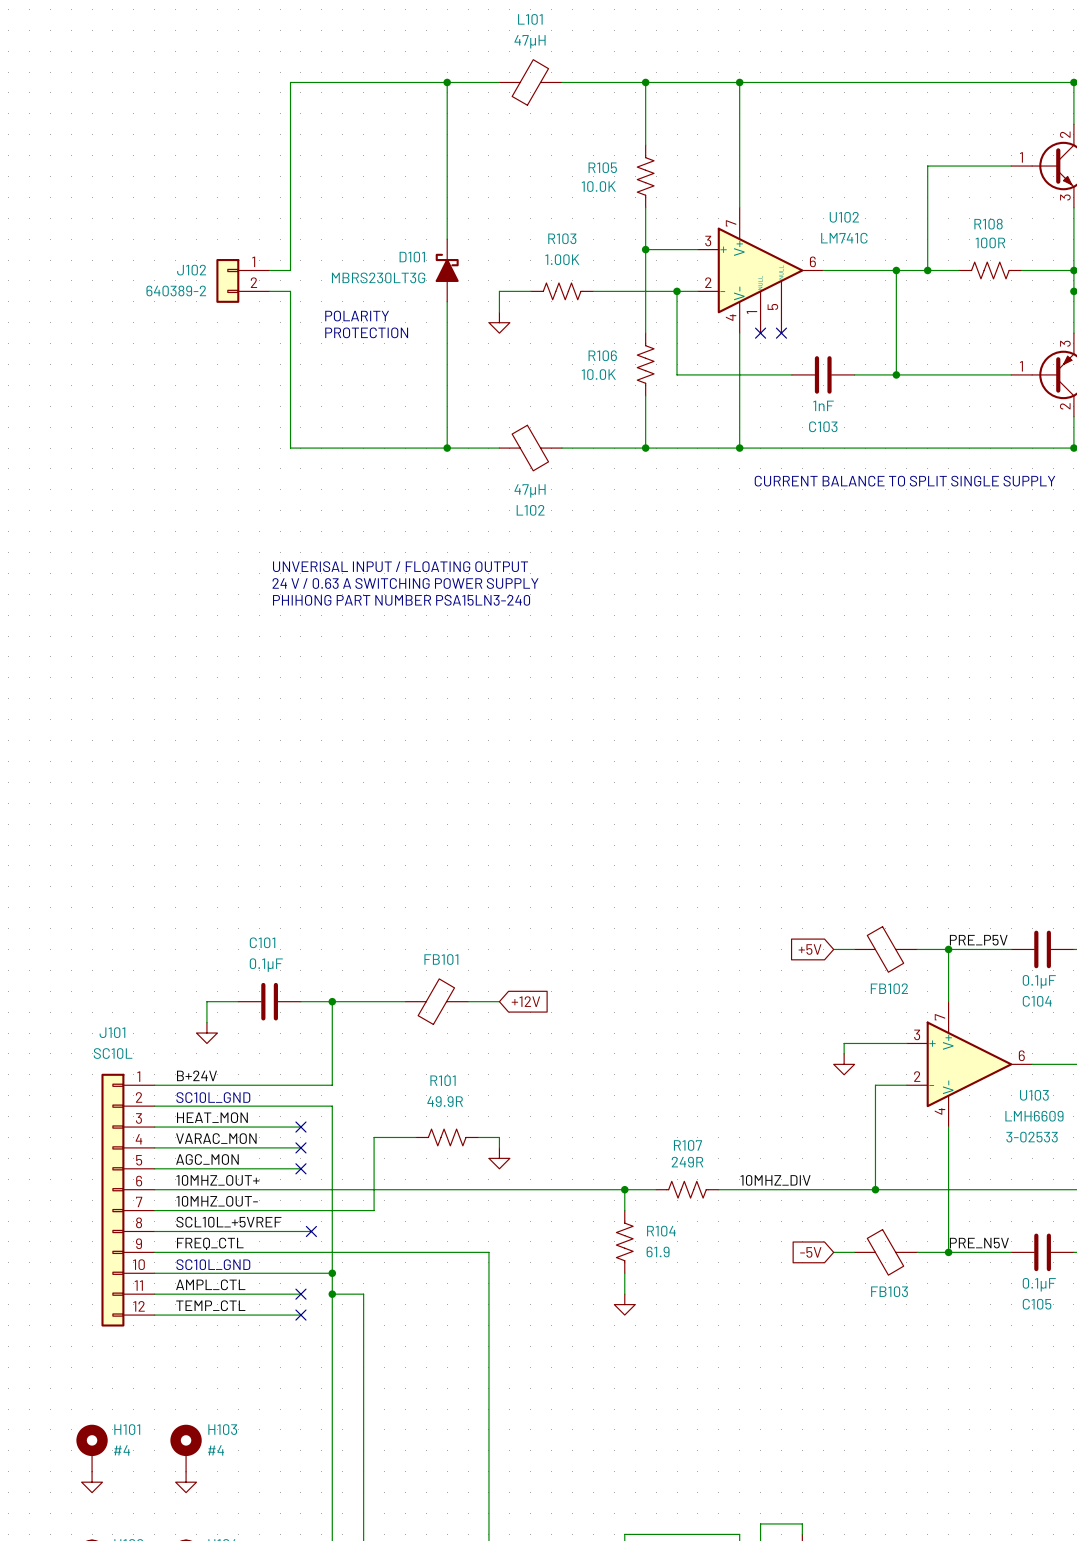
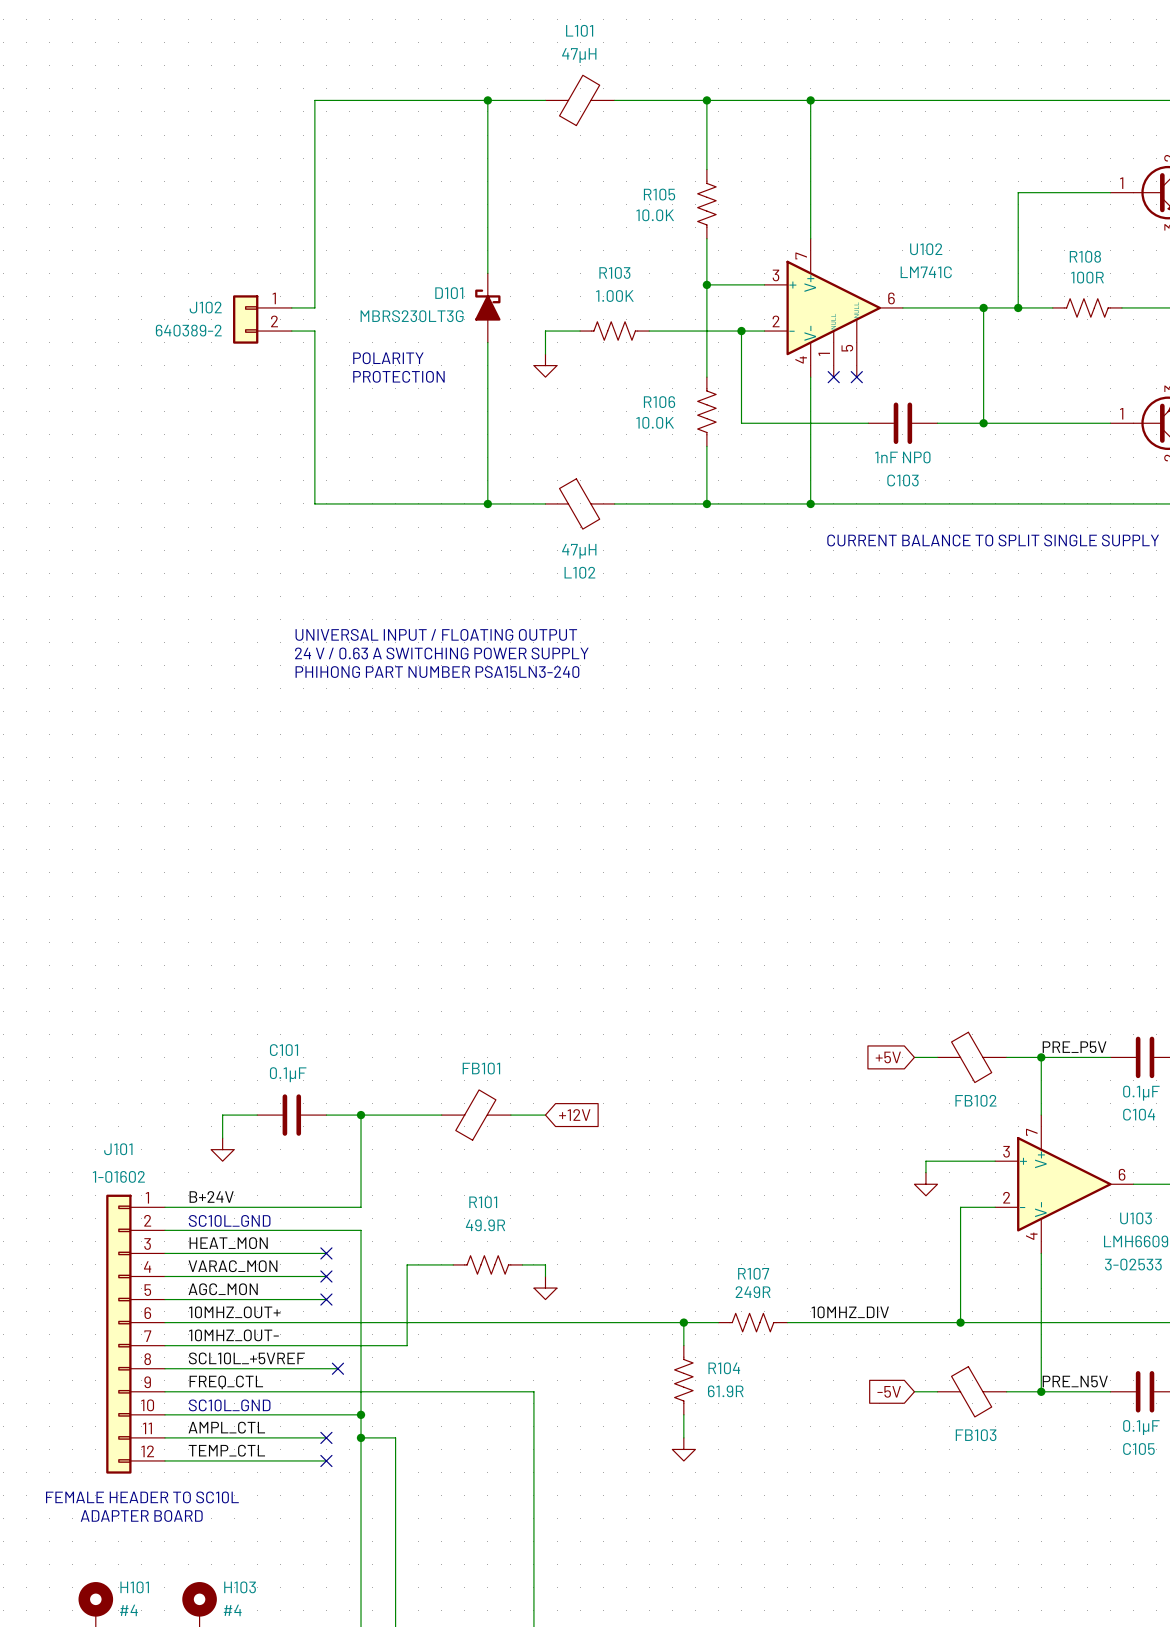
C103 value: 1nF (823, 405) -> 1nF NP0 (902, 457)
text: UNVERISAL INPUT / FLOATING OUTPUT (400, 566) -> UNIVERSAL INPUT / FLOATING OUTPUT (436, 634)
J101 value: SC10L (113, 1053) -> none
J101 text: none -> 1-01602 (118, 1176)
R104 value: 61.9 (658, 1251) -> 61.9R (725, 1391)
text: none -> FEMALE HEADER TO SC10L (142, 1497)
text: none -> ADAPTER BOARD (141, 1515)

